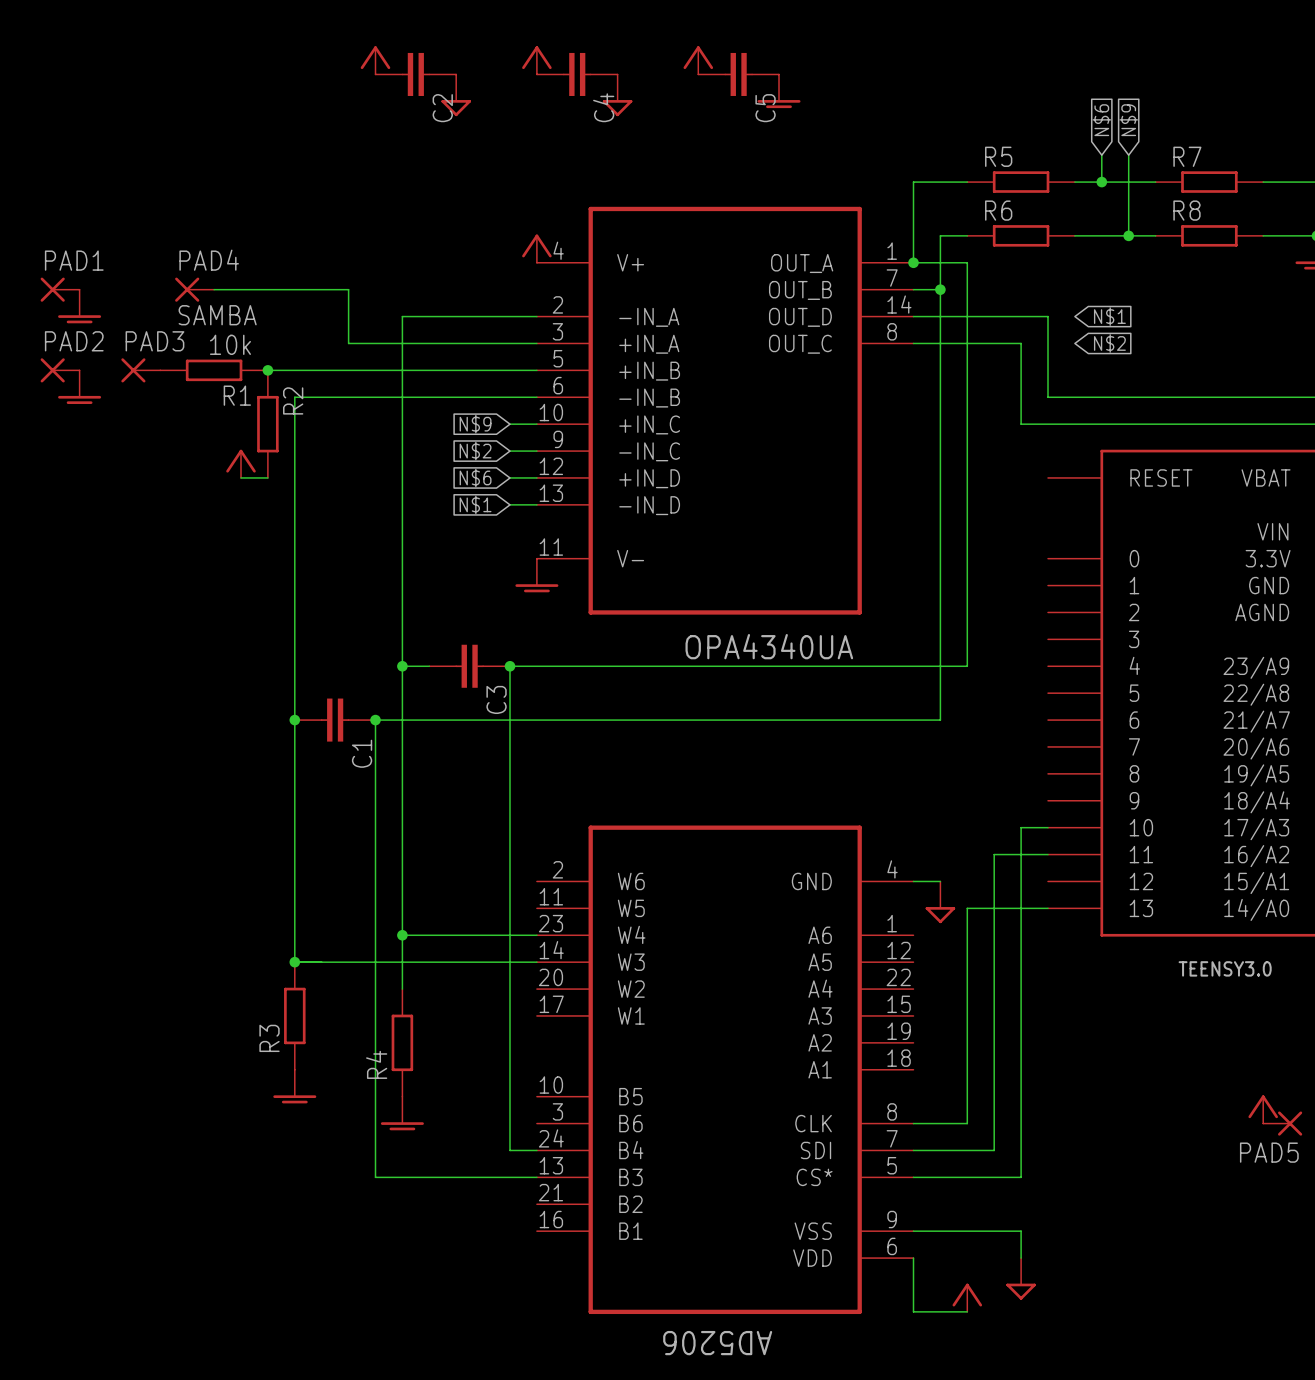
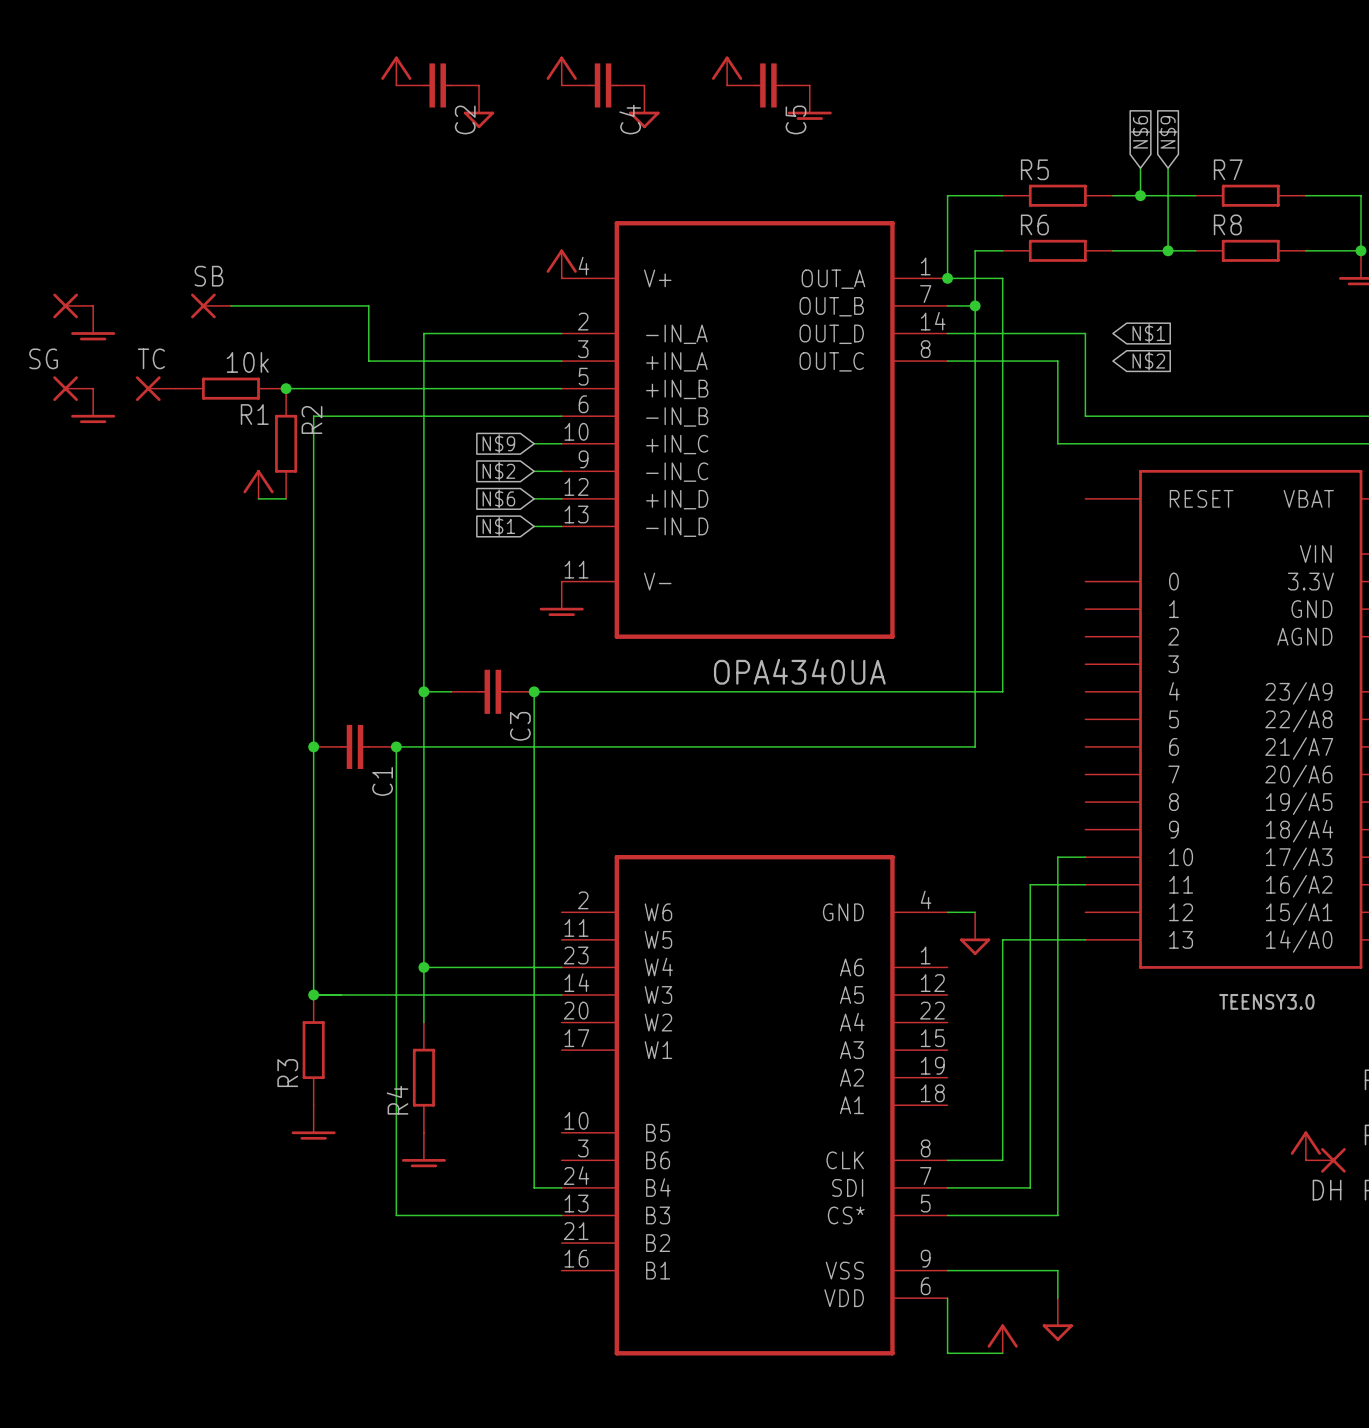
PAD1 name: PAD1 (74, 260) -> none
PAD4 name: PAD4 (209, 260) -> SB (208, 276)
PAD4 value: SAMBA (217, 315) -> none
PAD2 name: PAD2 (74, 341) -> SG (43, 358)
PAD3 name: PAD3 (154, 341) -> TC (151, 358)
PAD5 name: PAD5 (1269, 1152) -> DH (1327, 1190)
AD5206 name: AD5206 (717, 1343) -> none

